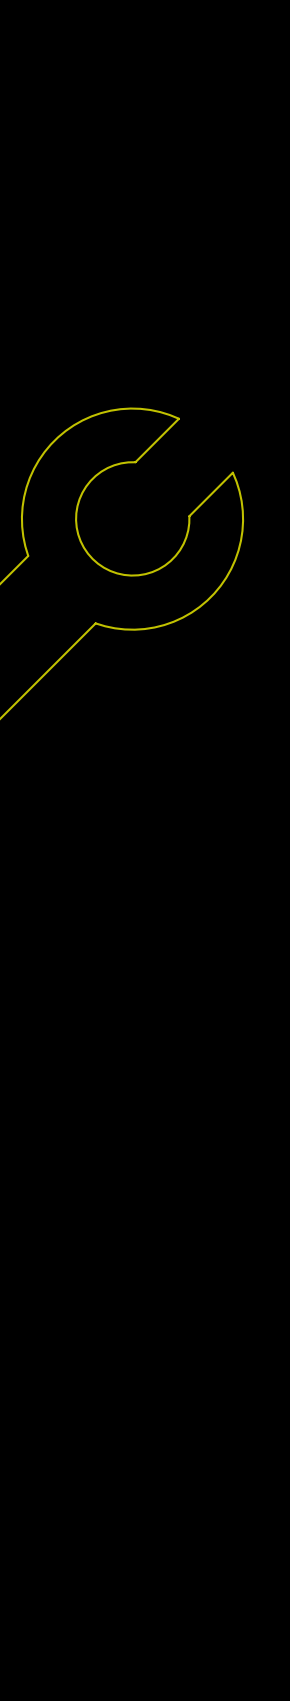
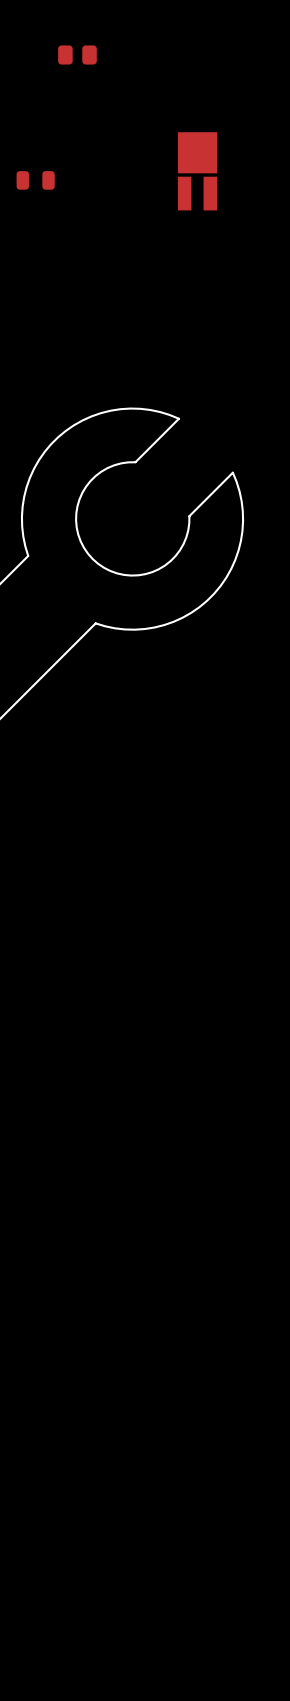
part: none -> (77, 54)
part: none -> (197, 171)
part: none -> (35, 180)

